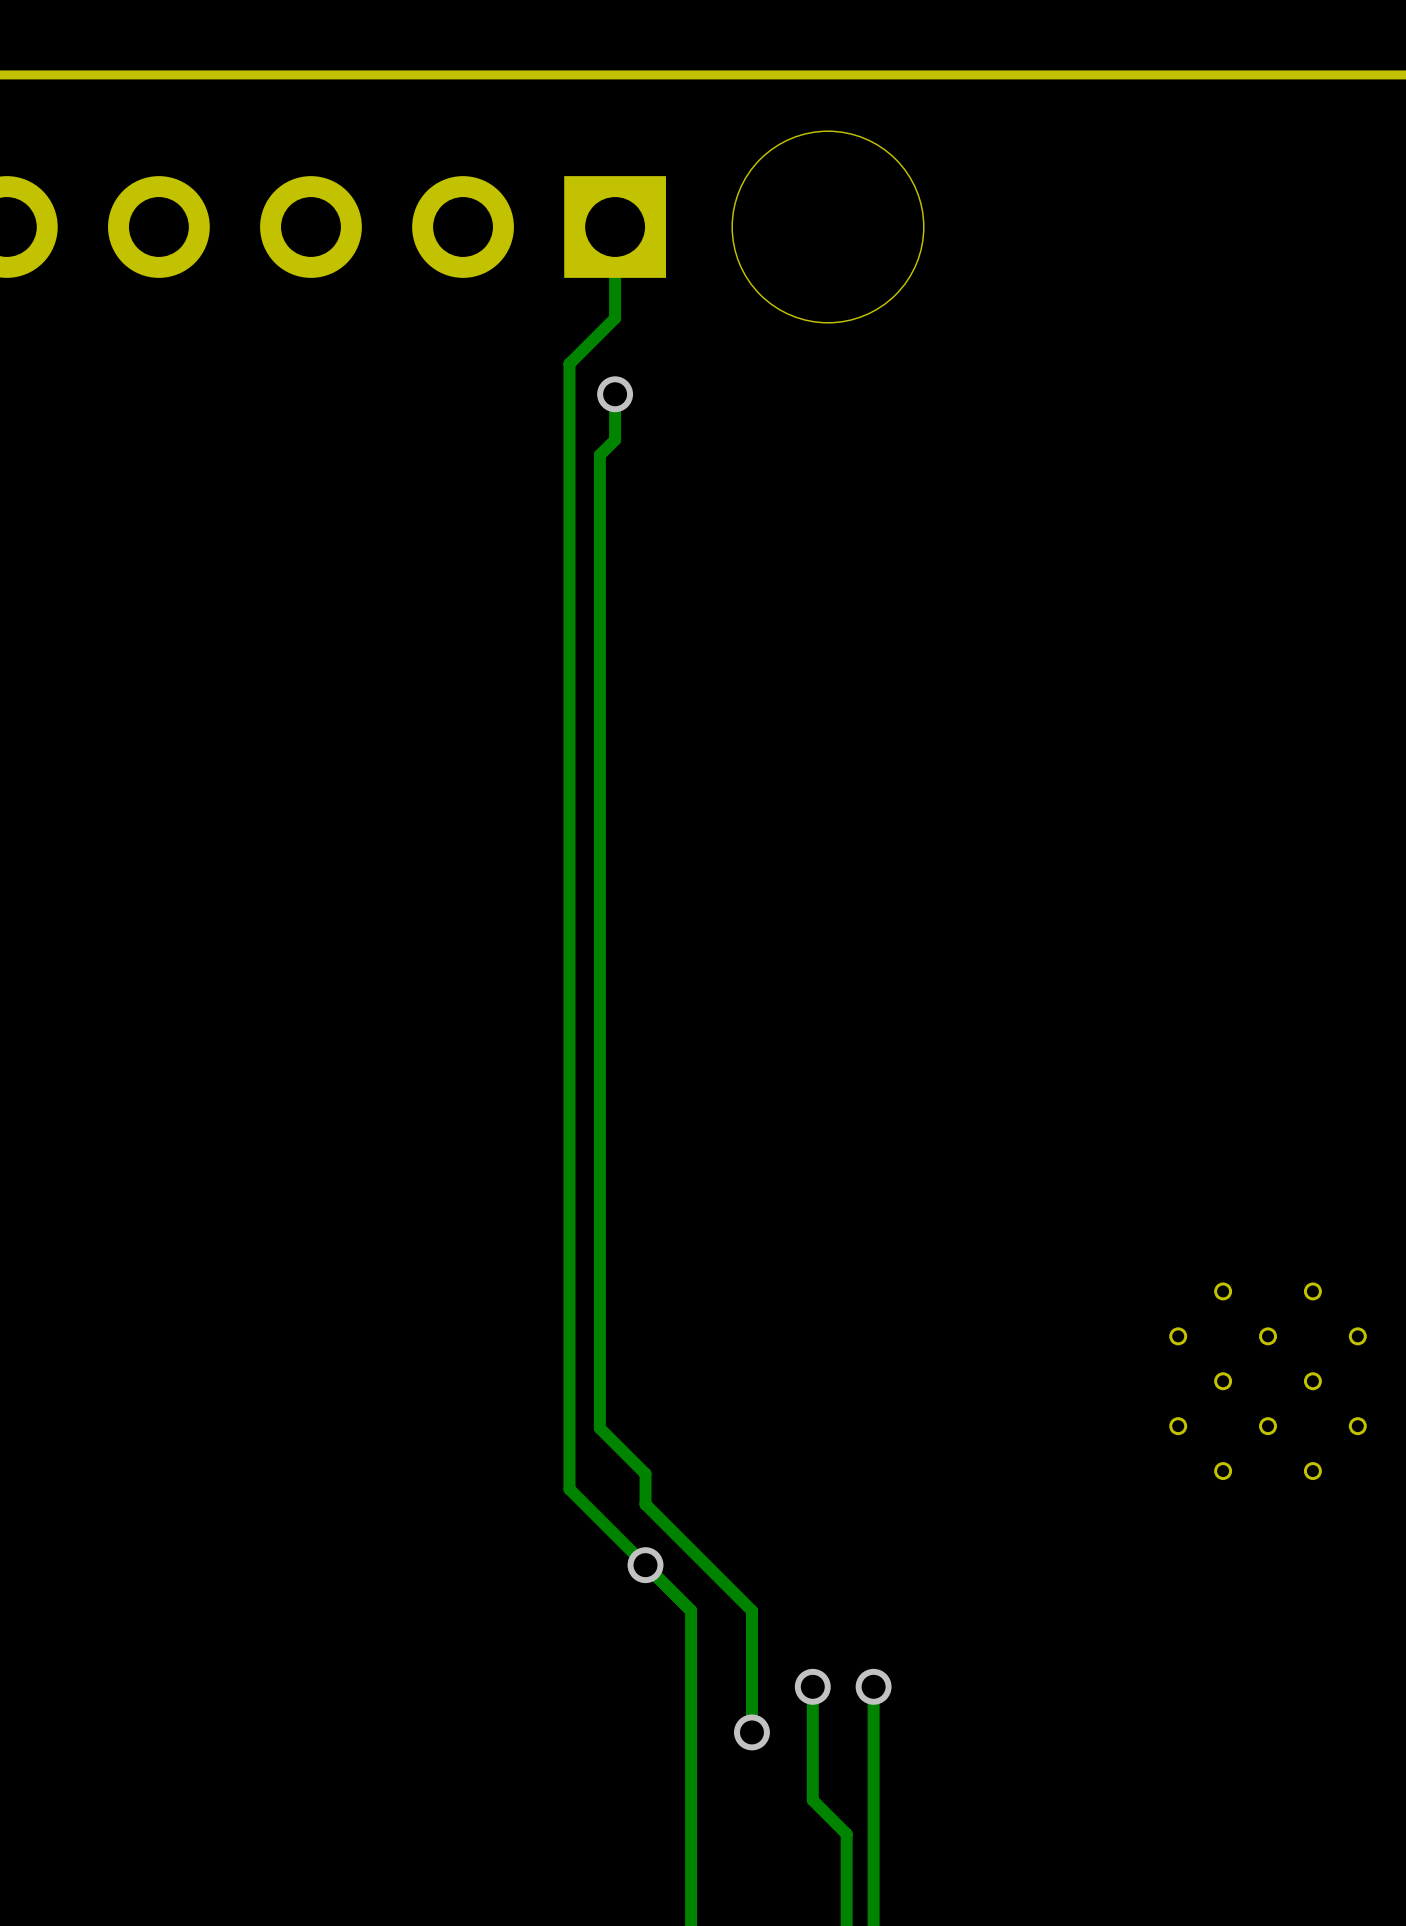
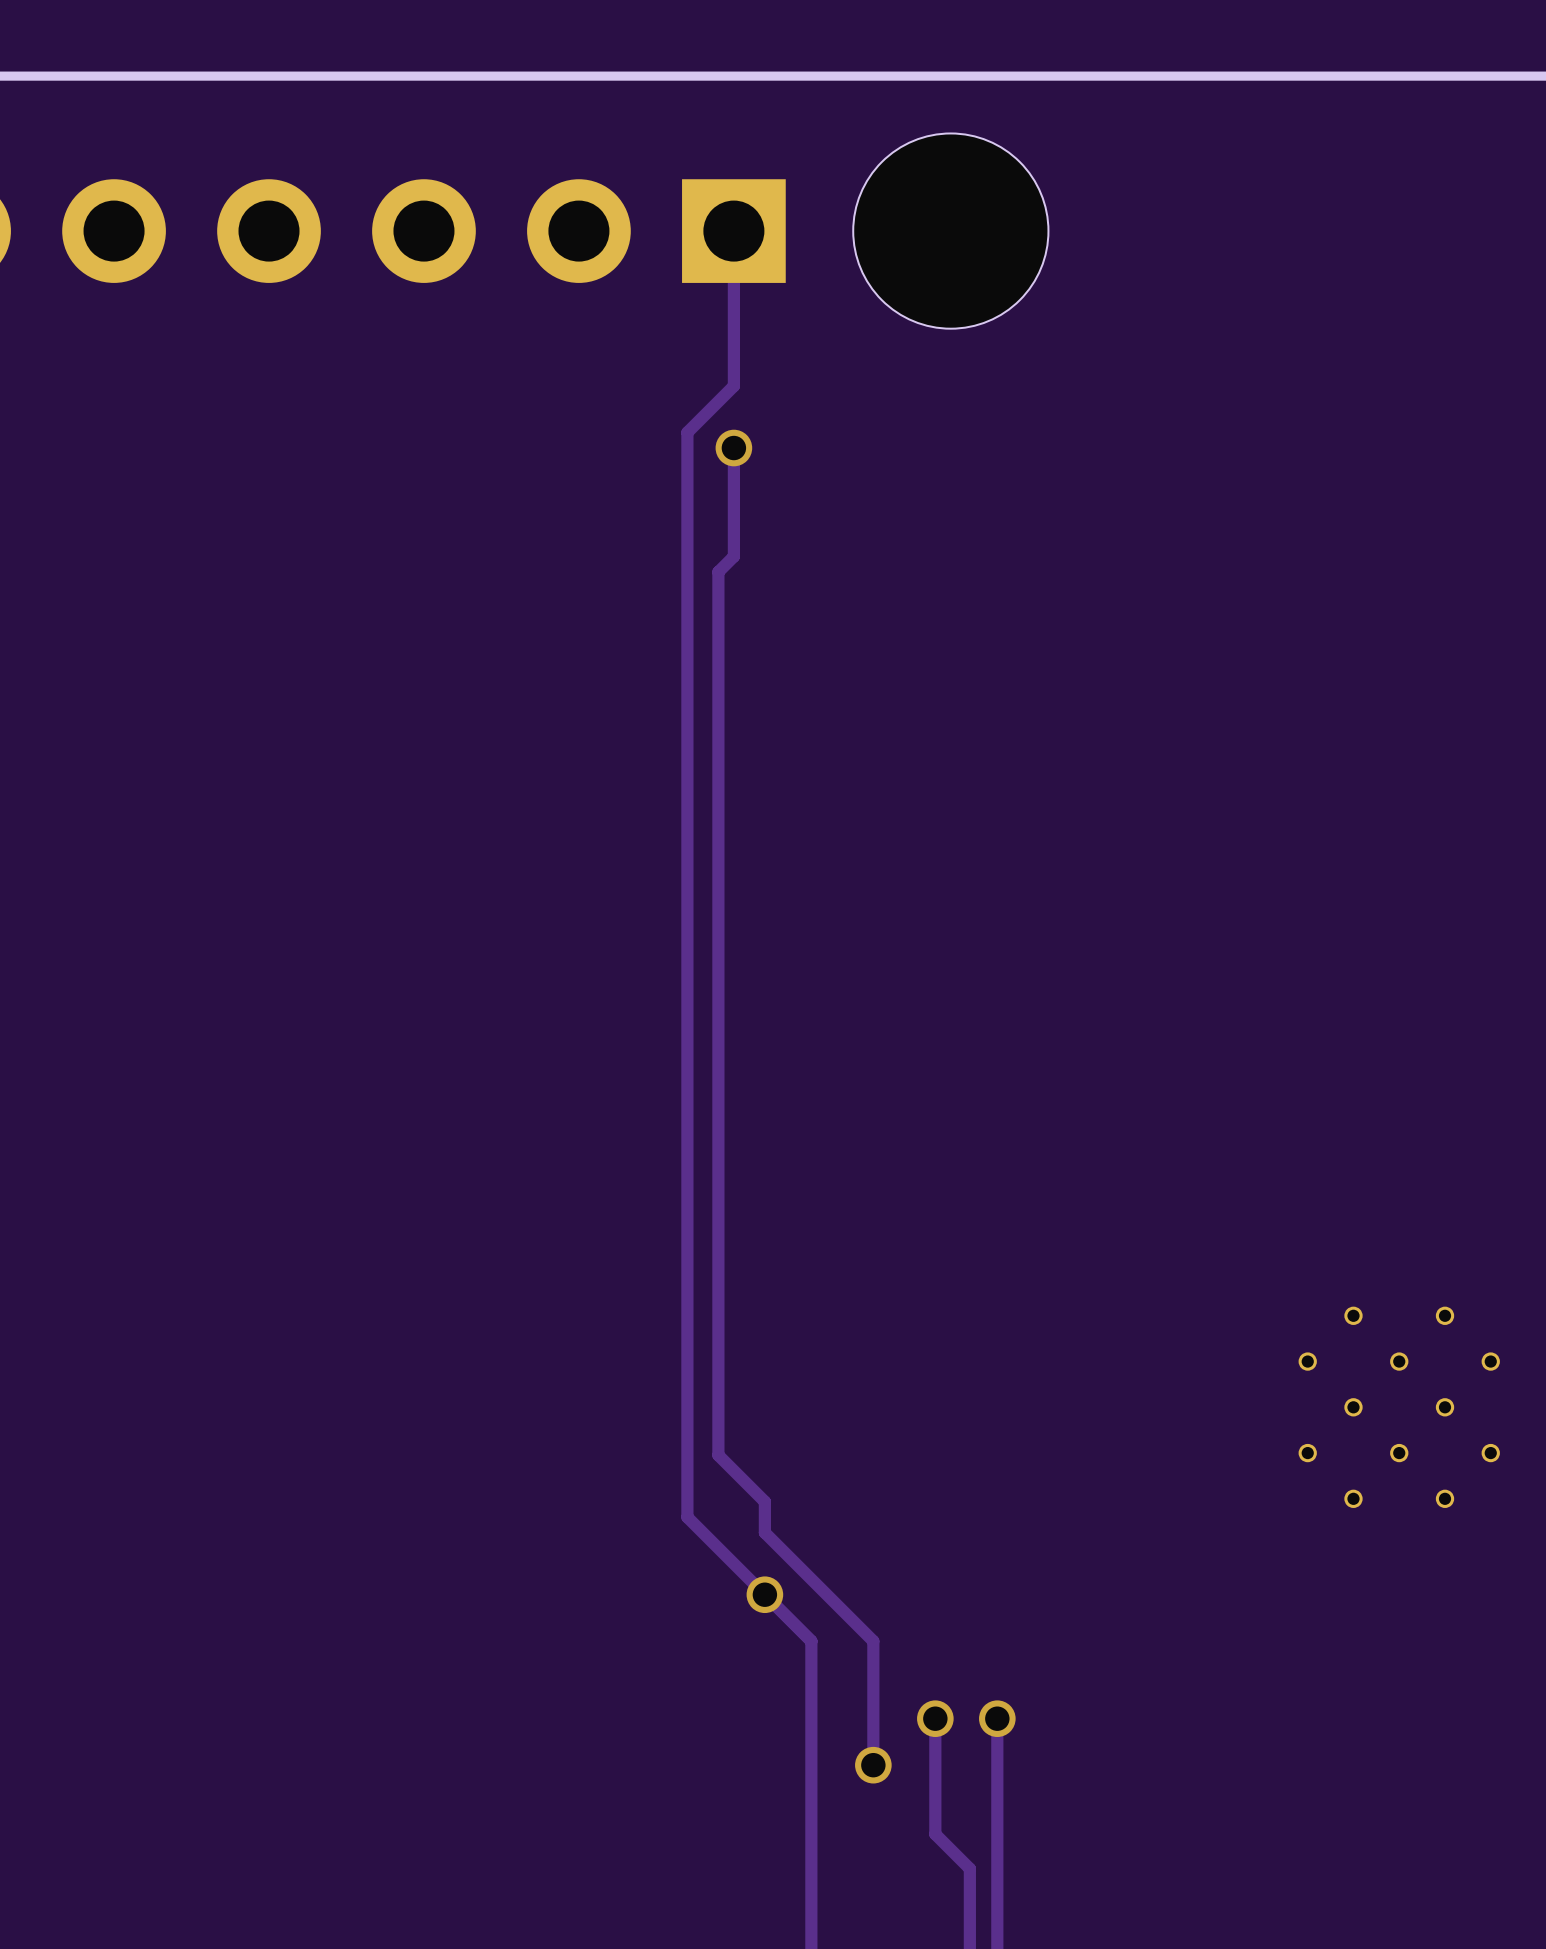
track: (615, 318) (569, 363) (569, 424) -> (733, 324) (733, 386) (687, 432)
track: (615, 394) (615, 439) (599, 455) (599, 561) -> (733, 448) (733, 556) (718, 571)
via position: (615, 394) -> (733, 448)

